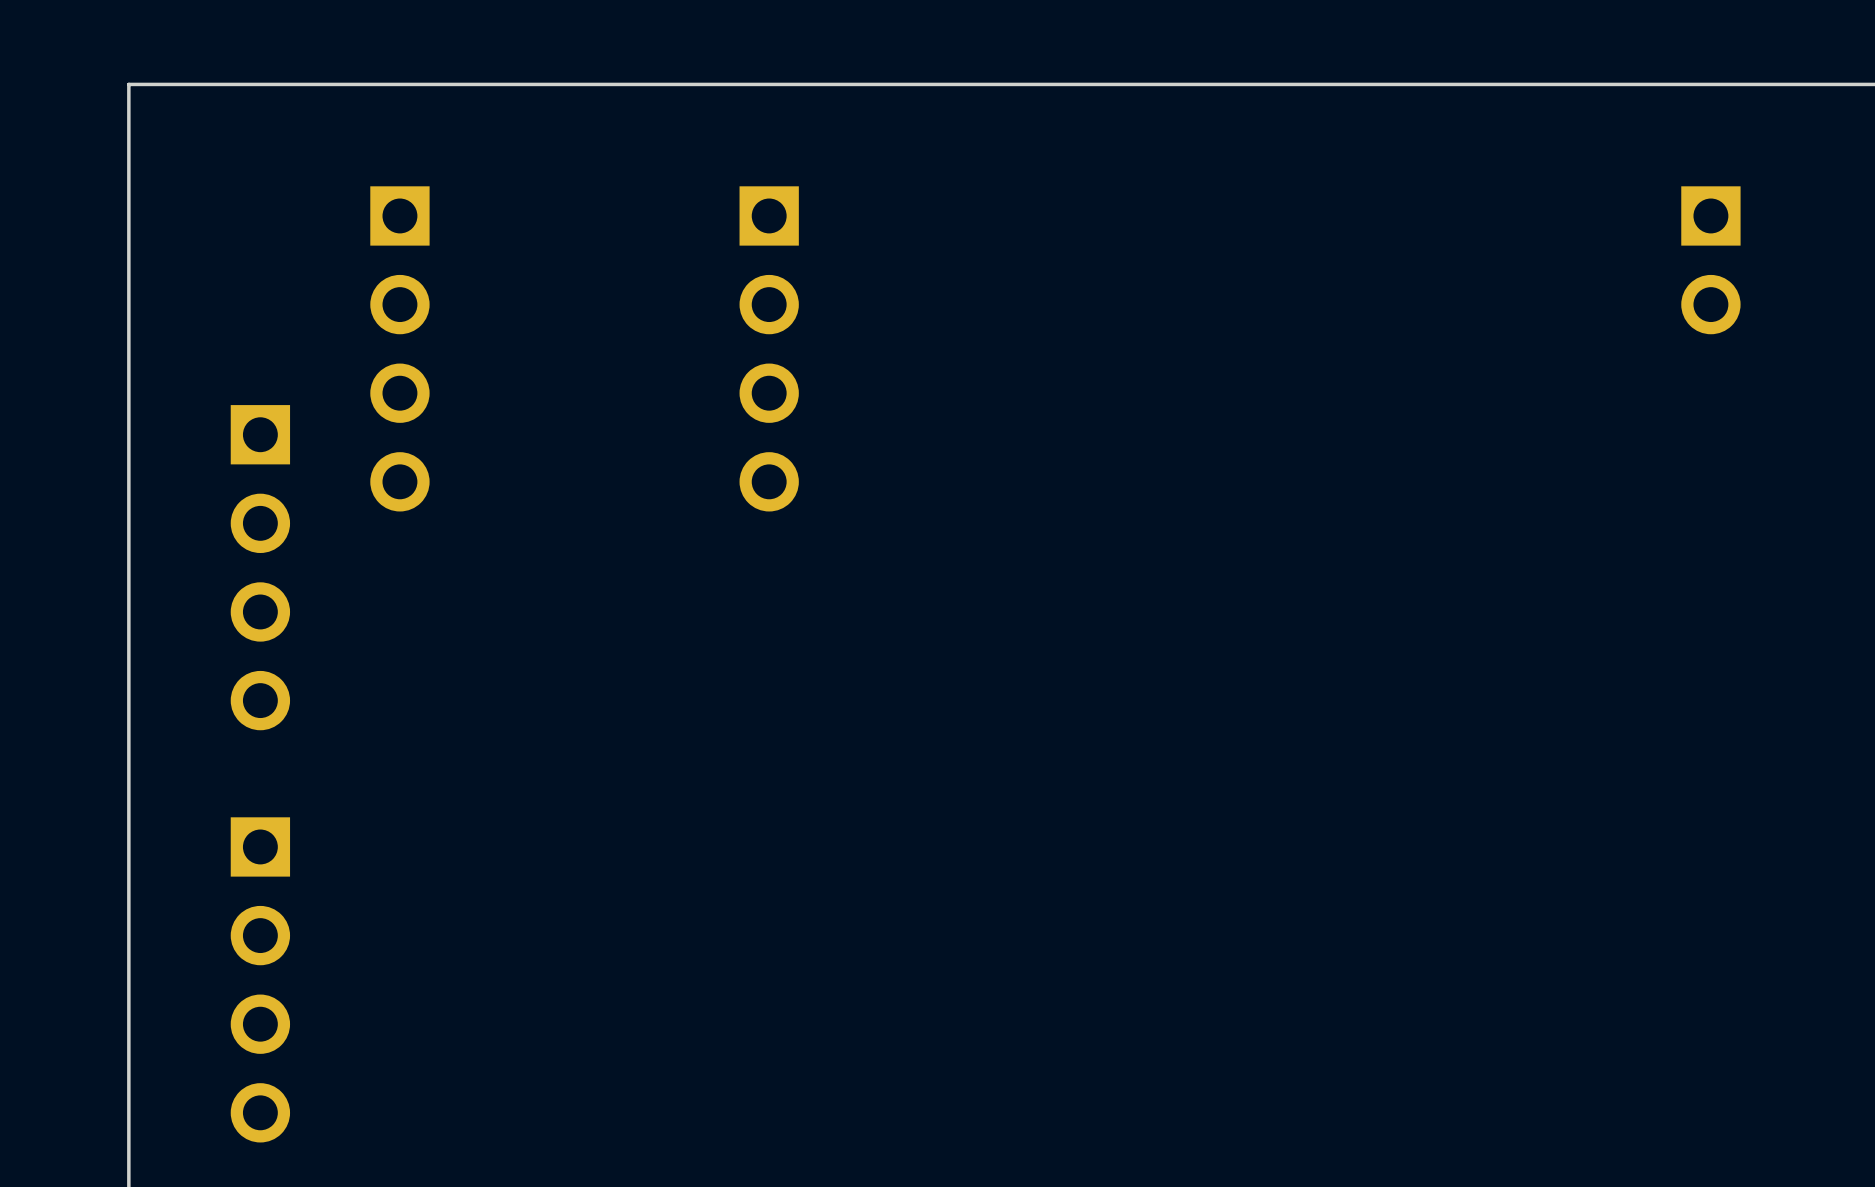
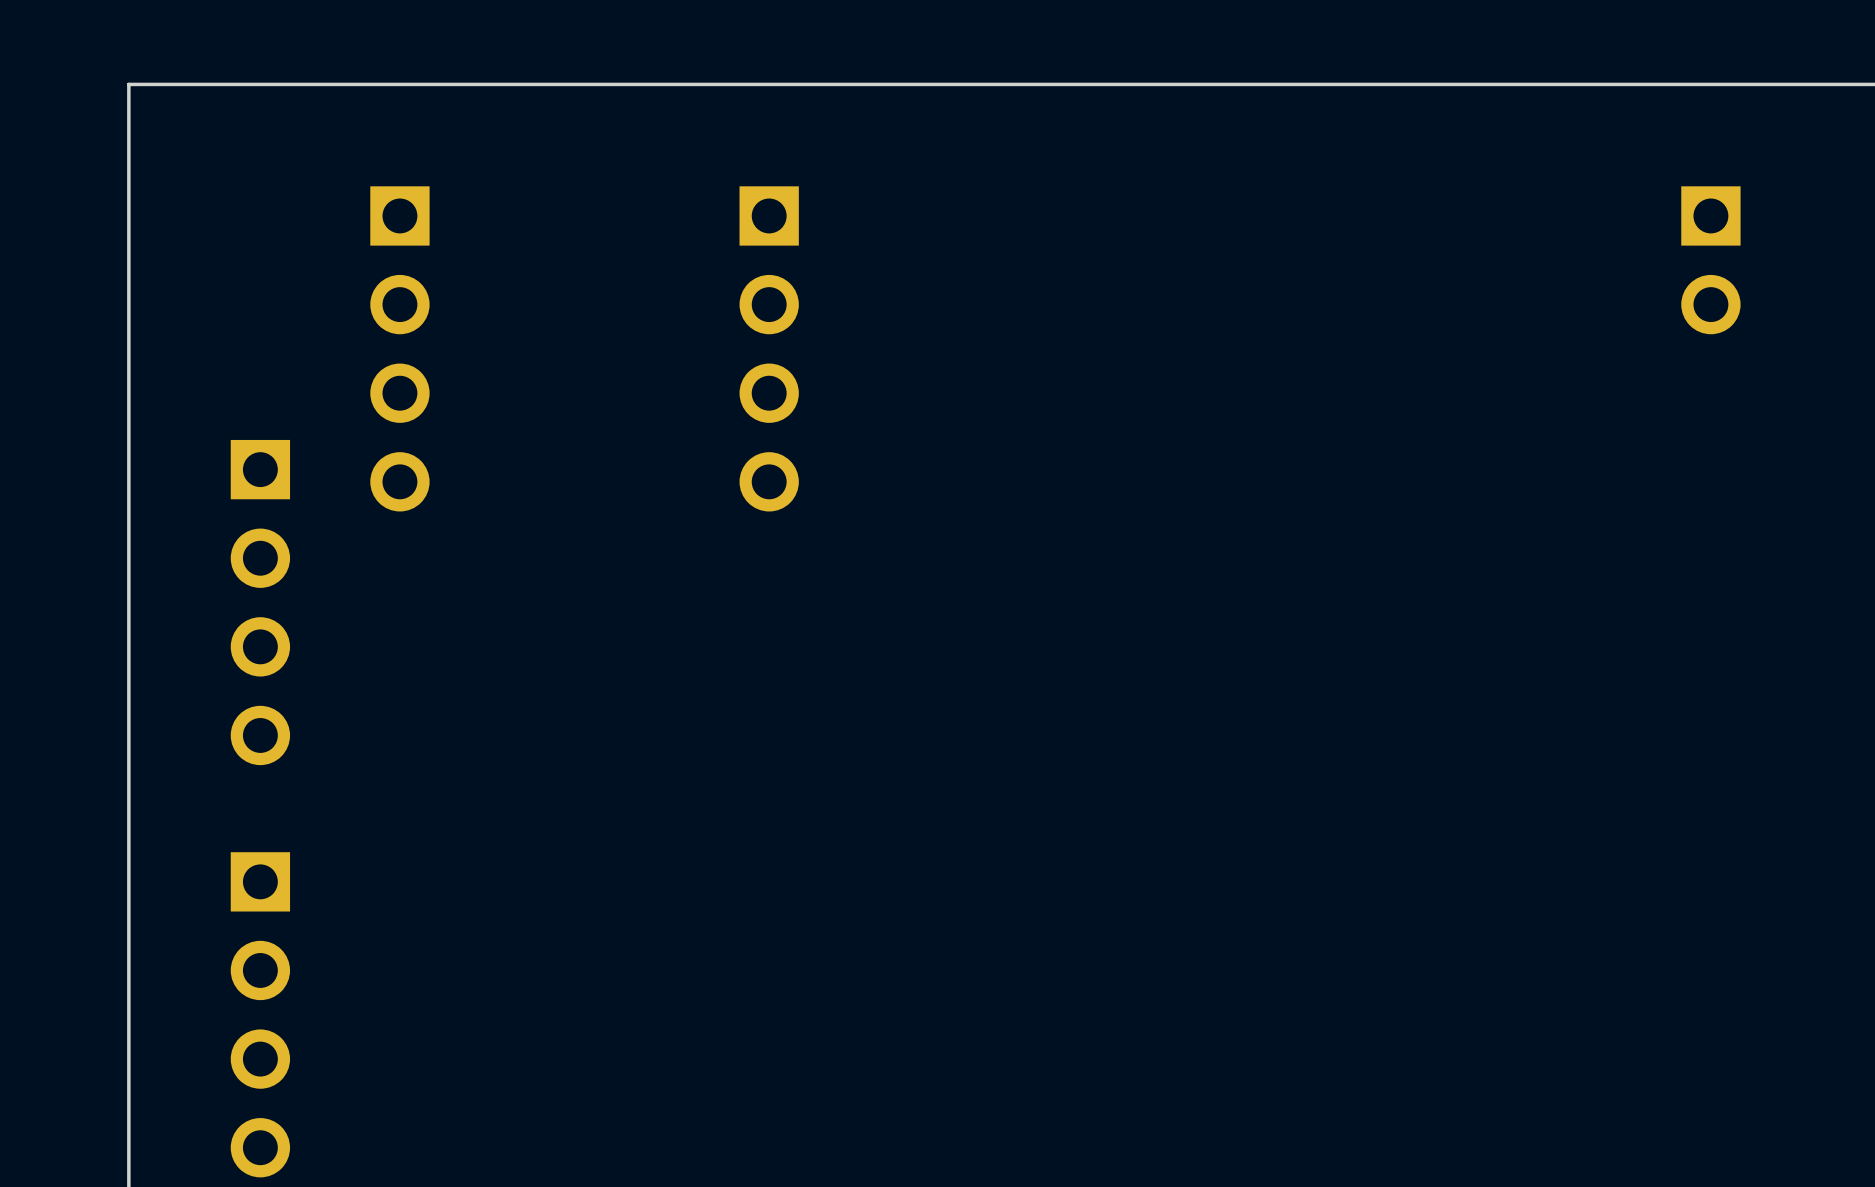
part position: (260, 567) -> (260, 602)
part position: (260, 979) -> (260, 1014)

